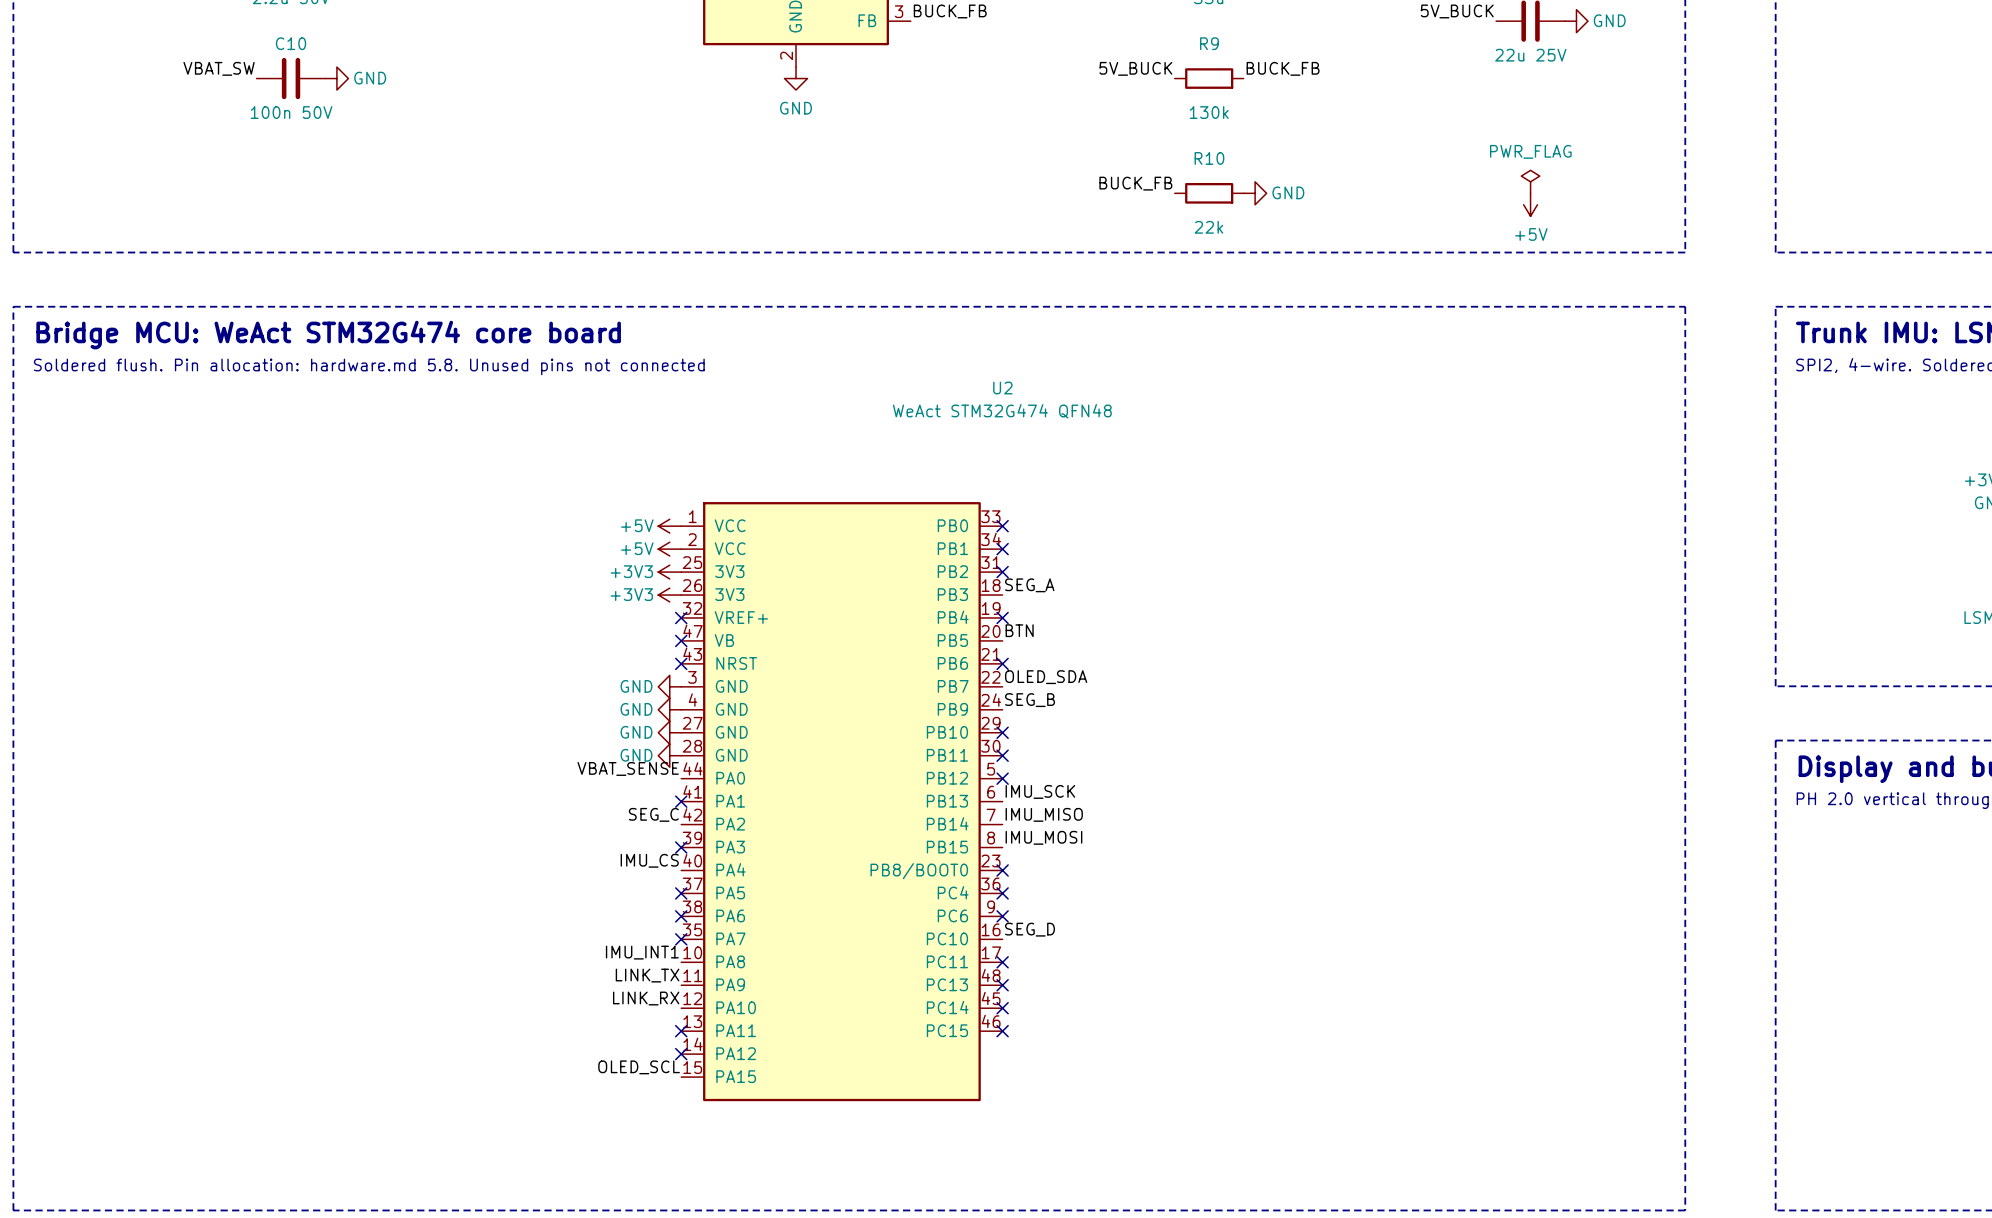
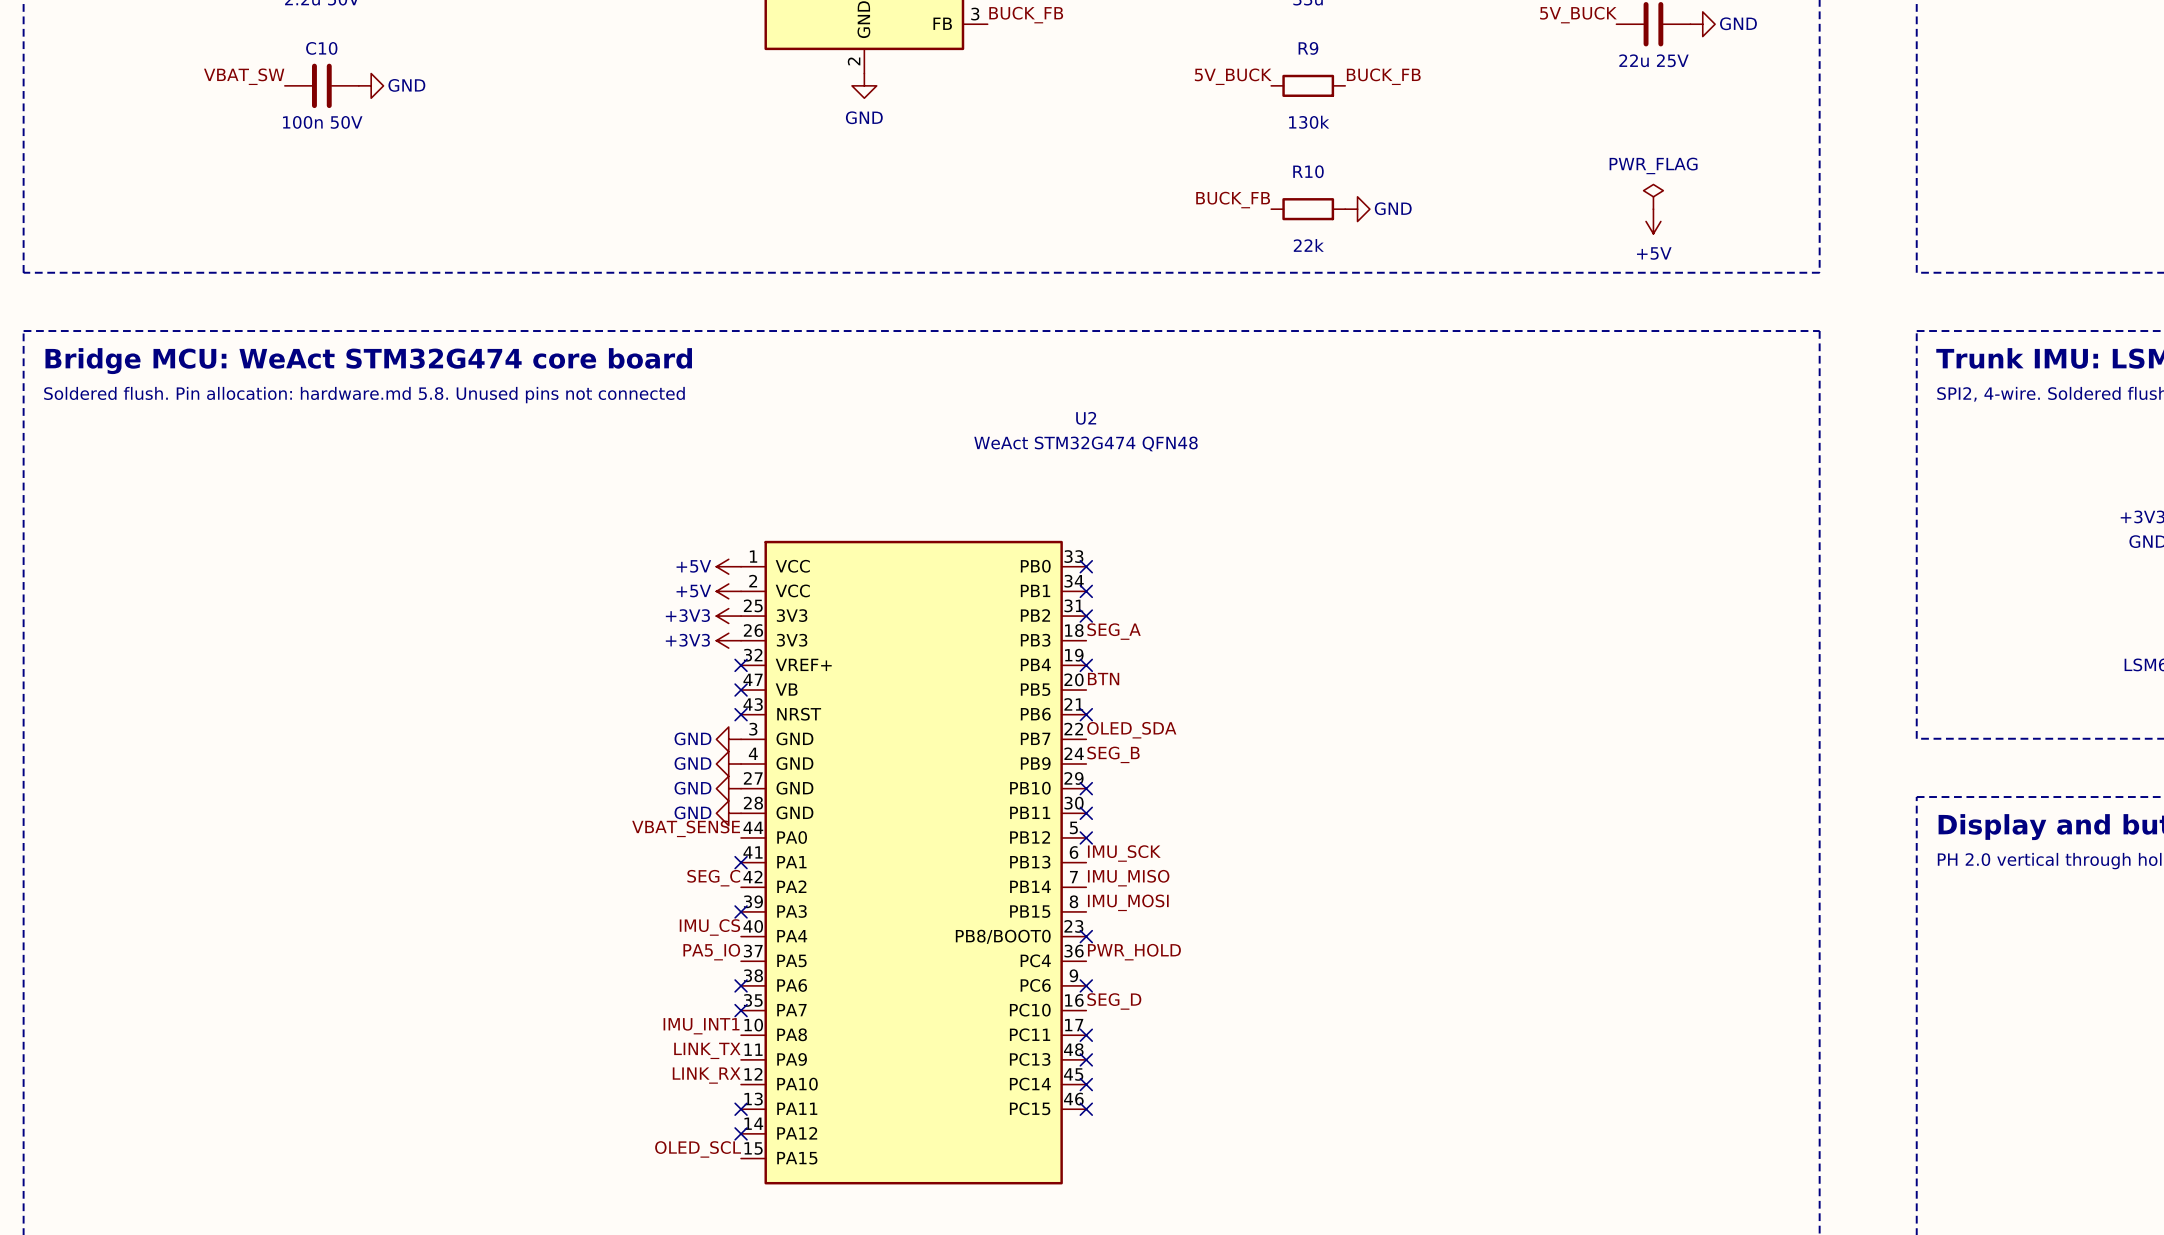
label: none -> PA5_IO (711, 952)
label: none -> PWR_HOLD (1134, 952)
no-connect mark: (681, 893) -> none
no-connect mark: (1002, 893) -> none

